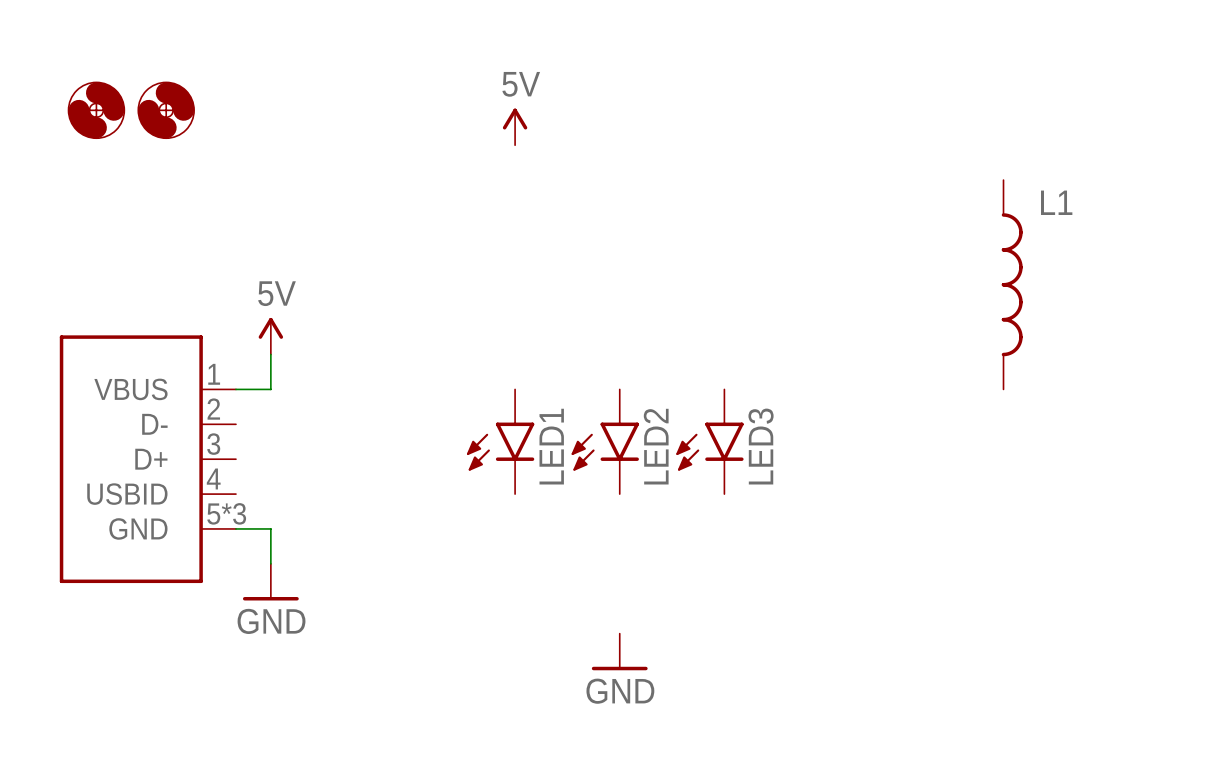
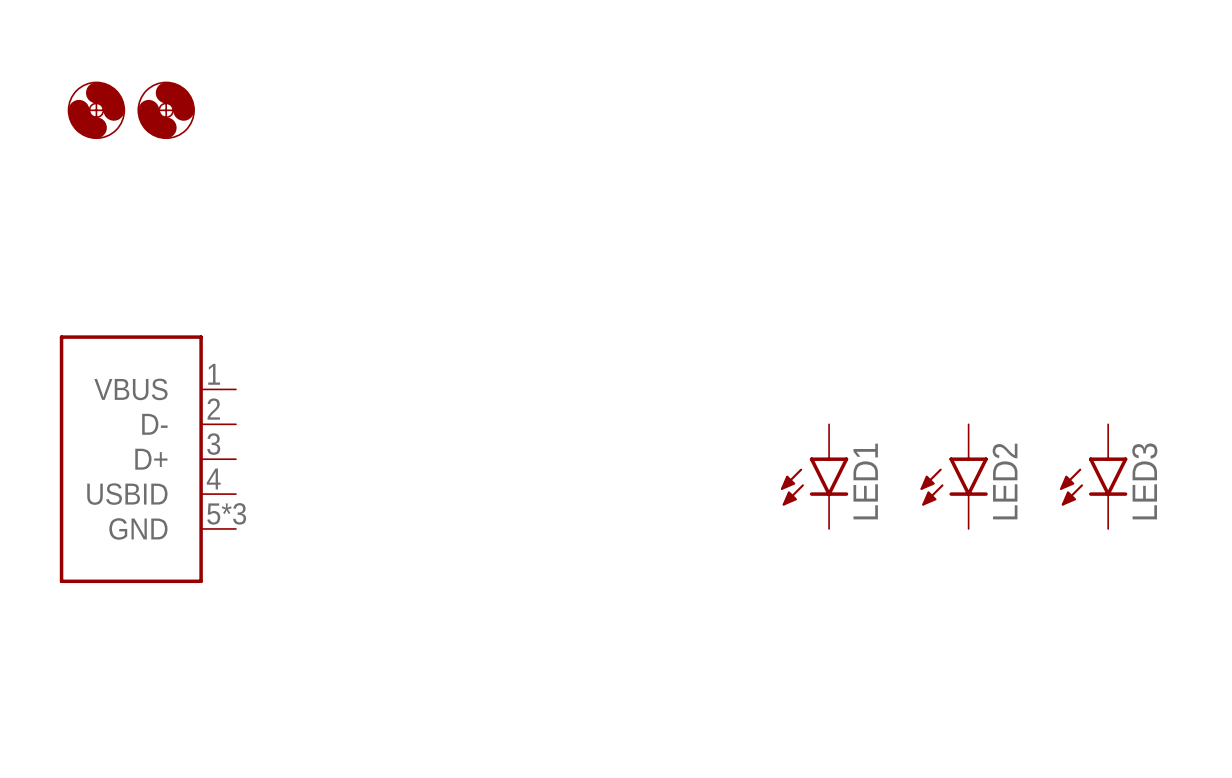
power symbol: 5V (515, 126) -> none
L1: (1012, 284) -> none
power symbol: 5V (270, 336) -> none
wire: (270, 354) (270, 389) (235, 389) -> none
LED1 position: (500, 441) -> (814, 476)
LED2 position: (605, 441) -> (954, 476)
LED3 position: (709, 441) -> (1093, 476)
wire: (235, 528) (270, 528) (270, 563) -> none
power symbol: GND (270, 582) -> none
power symbol: GND (619, 651) -> none

